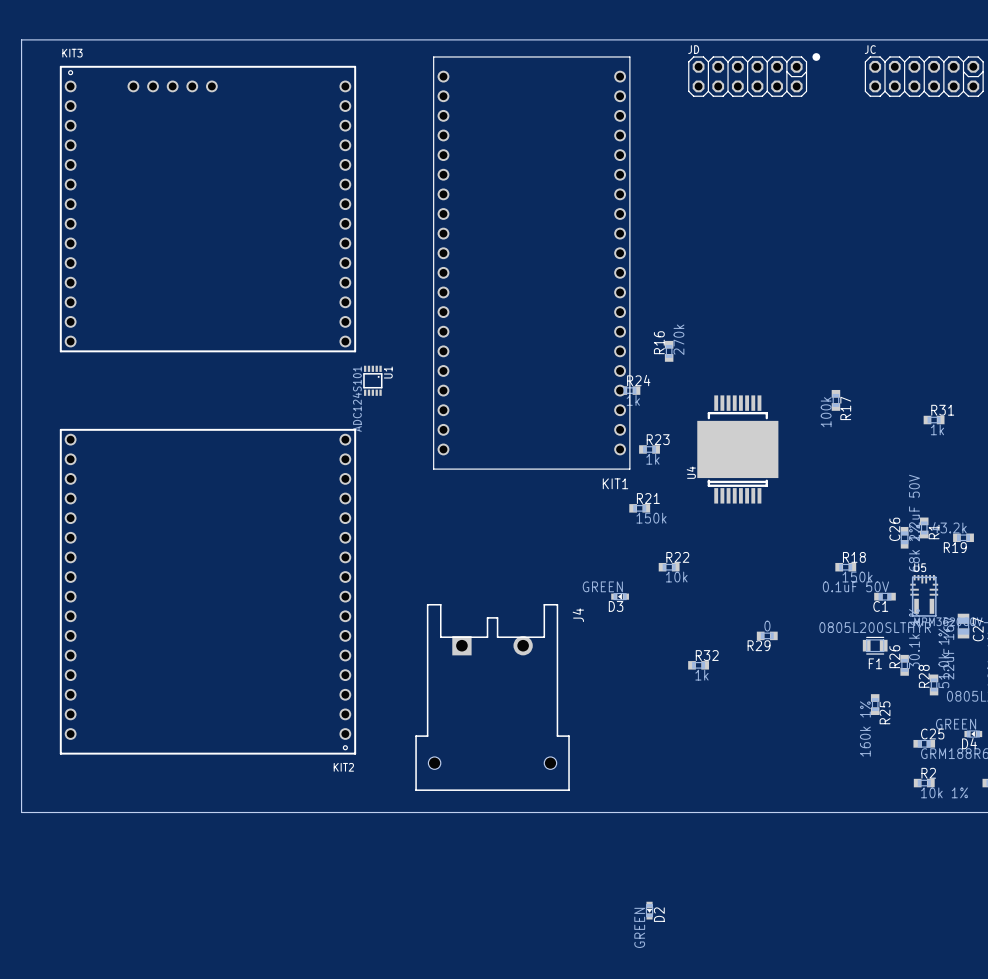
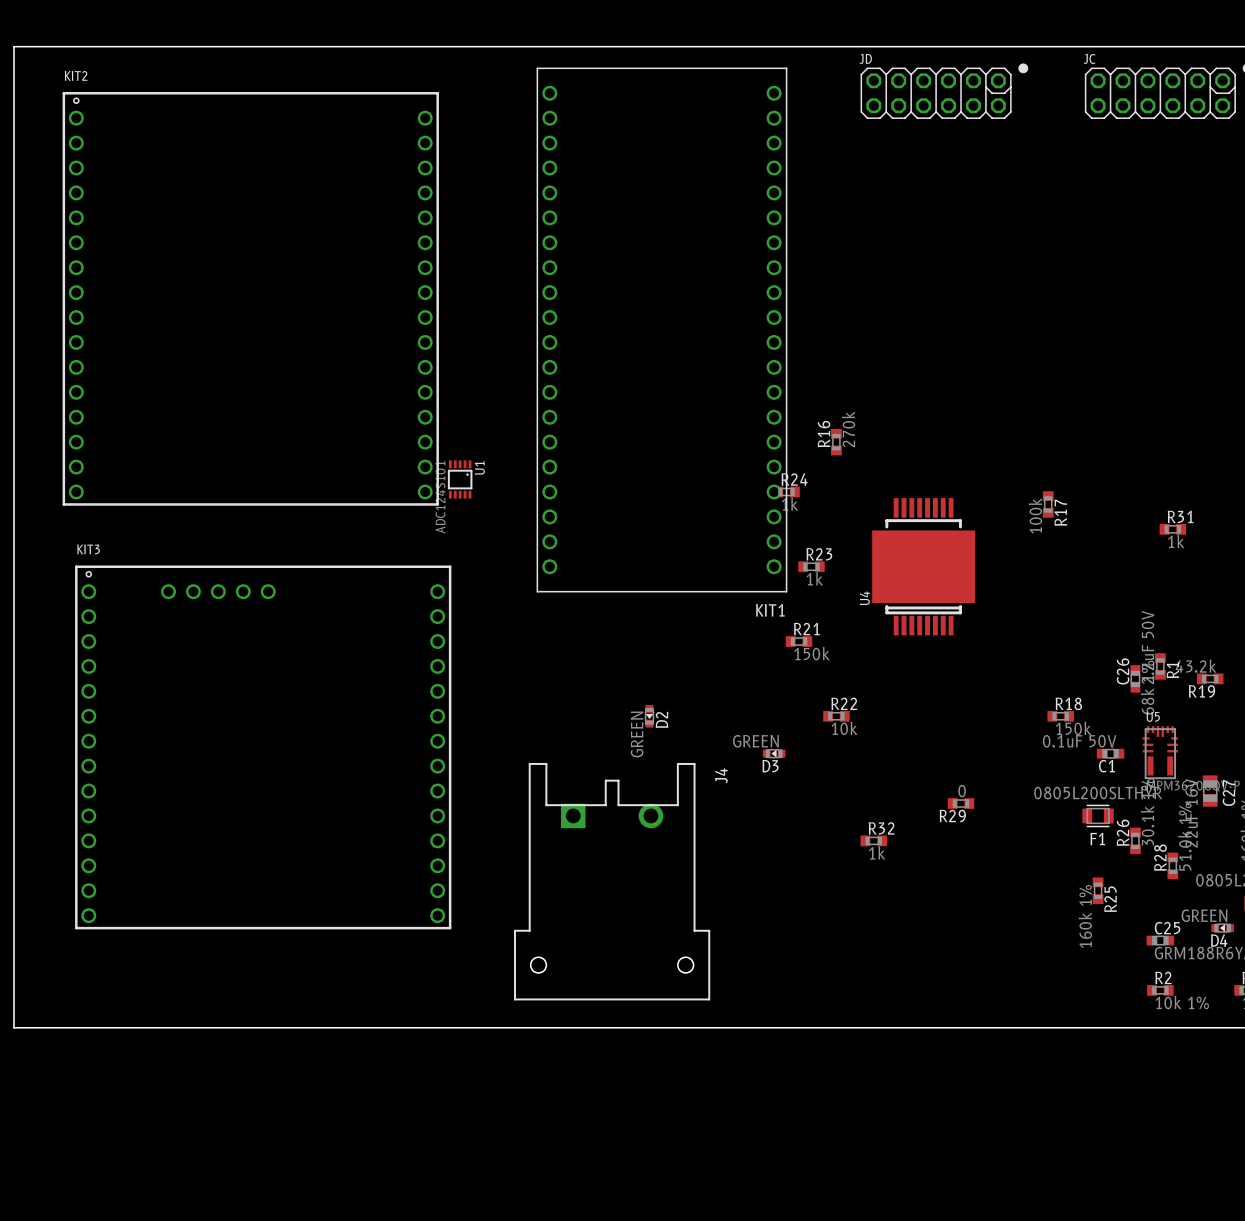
KIT3 position: (207, 209) -> (263, 747)
KIT2 rotation: 0° (207, 591) -> 180° (250, 298)
KIT2 position: (207, 591) -> (250, 298)
D2 position: (649, 910) -> (649, 716)

